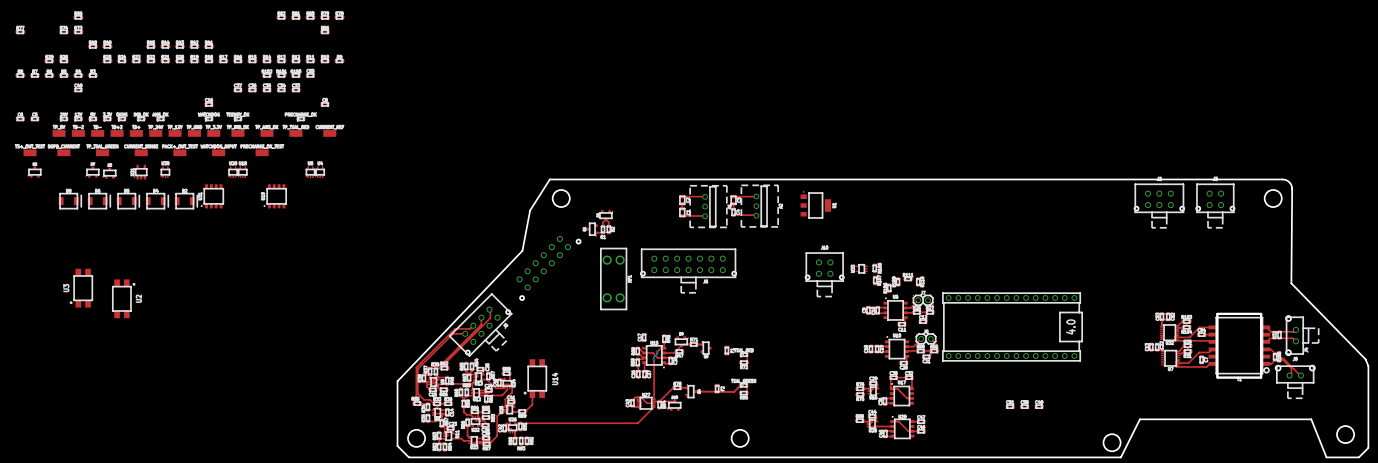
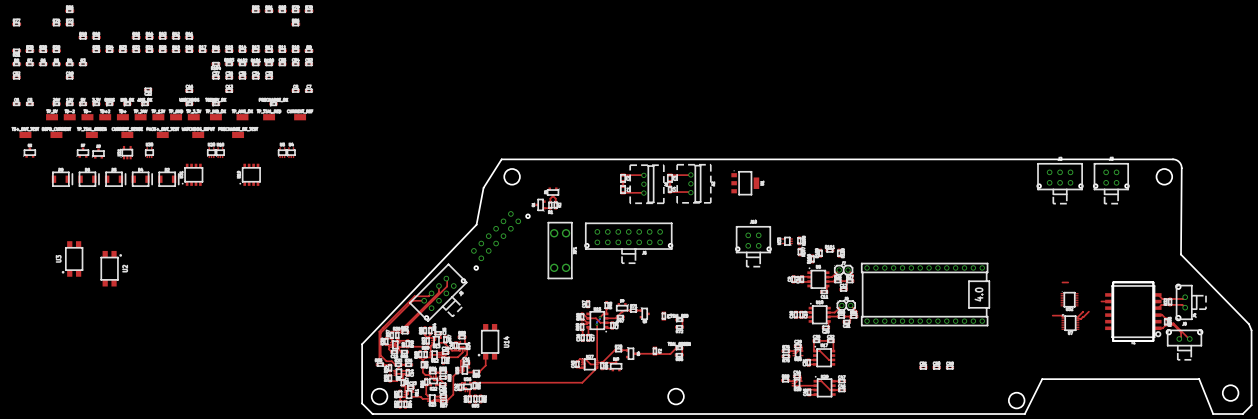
part rotation: 0° (1161, 316) -> 90° clockwise (308, 64)
part position: (1161, 316) -> (308, 64)
part rotation: 0° (1168, 316) -> 90° clockwise (16, 77)
part position: (1168, 316) -> (16, 77)
top track: (1168, 319) (1161, 319) (1161, 326) -> none
top track: (1183, 321) (1177, 326) -> none
part position: (1186, 321) -> (229, 64)
top track: (1189, 321) (1182, 327) (1177, 327) -> none
part position: (1186, 327) -> (215, 64)
top track: (1212, 327) (1199, 327) (1189, 337) (1177, 337) -> none
top track: (1177, 329) (1177, 331) -> none
part position: (1201, 334) -> (295, 64)
top track: (1161, 335) (1161, 339) -> none
top track: (1177, 335) (1175, 336) (1175, 340) (1212, 341) -> none
part position: (1187, 345) -> (29, 50)
part rotation: 0° (1151, 347) -> 90° clockwise (229, 90)
part position: (1151, 347) -> (229, 90)
part rotation: 0° (1157, 347) -> 90° clockwise (148, 89)
part position: (1157, 347) -> (148, 89)
top track: (1212, 349) (1209, 352) (1199, 352) (1188, 363) (1178, 363) -> none
part position: (1187, 351) -> (16, 50)
part rotation: 0° (1201, 359) -> 90° clockwise (308, 90)
part position: (1201, 359) -> (308, 90)
top track: (1178, 361) (1176, 362) (1176, 366) (1206, 366) (1212, 363) -> none

